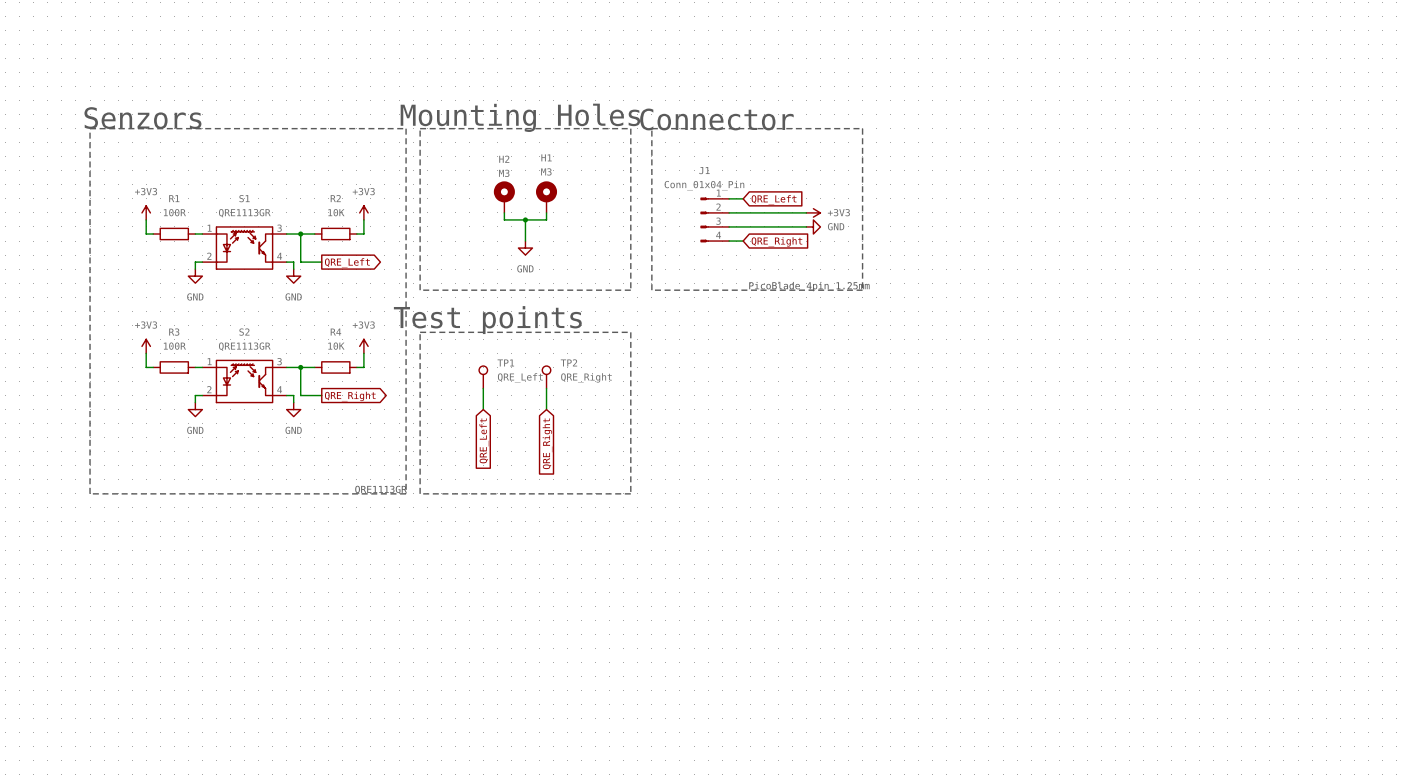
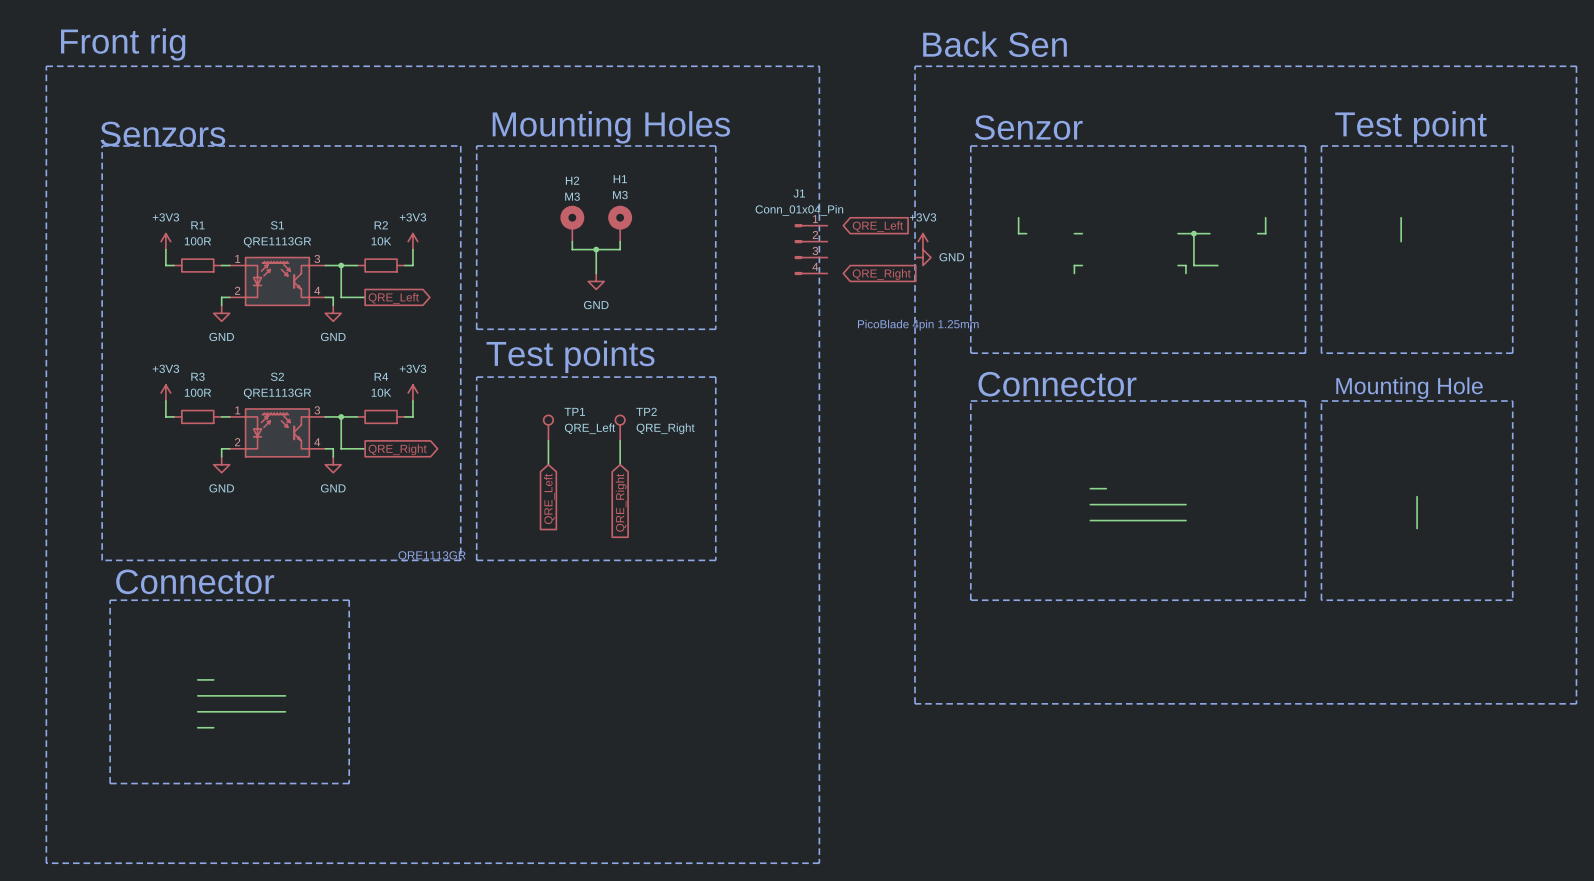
text: none -> Front rig (123, 44)
text: none -> Back Sen (995, 44)
line: none -> (46, 66) (819, 66) (819, 863) (46, 863) (46, 66)
line: none -> (915, 66) (1576, 66) (1576, 703) (915, 703) (915, 66)
text: none -> Senzor (1028, 127)
text: none -> Test point (1410, 127)
text position: Mounting Holes (520, 117) -> Mounting Holes (611, 127)
text: Connector (716, 119) -> none
line: (855, 128) (651, 128) (651, 290) (862, 290) (862, 128) -> (970, 145) (970, 353) (1305, 353) (1305, 145) (978, 145)
line: none -> (1321, 145) (1321, 353) (1512, 353) (1512, 145) (1321, 145)
wire: none -> (1018, 217) (1018, 233) (1026, 233)
wire: none -> (1265, 217) (1265, 233) (1257, 233)
wire: none -> (1401, 217) (1401, 241)
wire: (729, 198) (743, 198) -> none
wire: none -> (1074, 233) (1082, 233)
wire: none -> (1178, 233) (1209, 233)
wire: none -> (1193, 233) (1193, 265) (1217, 265)
junction: none -> (1193, 233)
wire: (729, 212) (806, 212) -> none
power symbol rotation: 0° (813, 212) -> 90° counterclockwise (922, 241)
wire: (729, 226) (806, 226) -> none
wire: none -> (1082, 265) (1074, 265) (1074, 273)
wire: none -> (1178, 265) (1185, 265) (1185, 273)
wire: (729, 241) (743, 241) -> none
text position: Test points (487, 320) -> Test points (570, 356)
text: none -> Connector (1057, 384)
text: none -> Mounting Hole (1409, 388)
line: none -> (970, 401) (1305, 401) (1305, 600) (970, 600) (970, 401)
line: none -> (1321, 401) (1512, 401) (1512, 600) (1321, 600) (1321, 401)
wire: none -> (1090, 488) (1106, 488)
wire: none -> (1417, 496) (1417, 528)
wire: none -> (1090, 504) (1185, 504)
wire: none -> (1090, 520) (1185, 520)
text: none -> Connector (195, 581)
line: none -> (110, 600) (349, 600) (349, 783) (110, 783) (110, 600)
wire: none -> (197, 679) (213, 679)
wire: none -> (197, 695) (285, 695)
wire: none -> (197, 711) (285, 711)
wire: none -> (197, 727) (213, 727)

